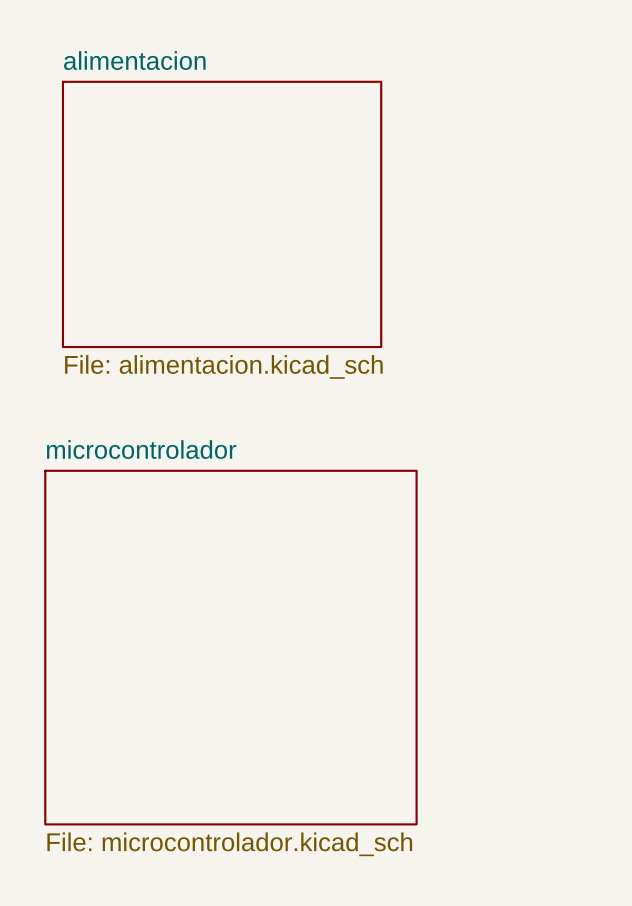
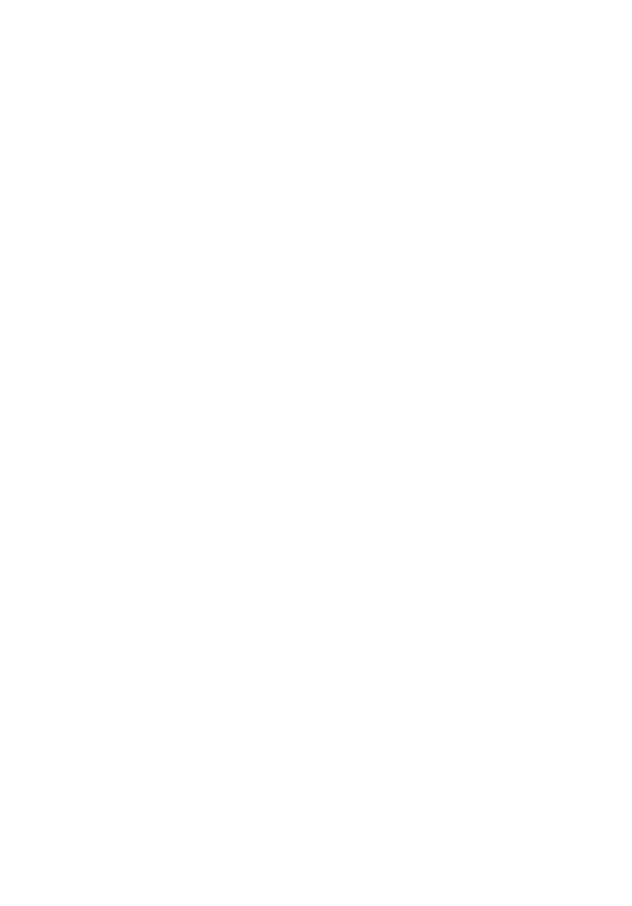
sheet alimentacion: File: alimentacion.kicad_sch (222, 214) -> none
sheet microcontrolador: File: microcontrolador.kicad_sch (230, 647) -> none

